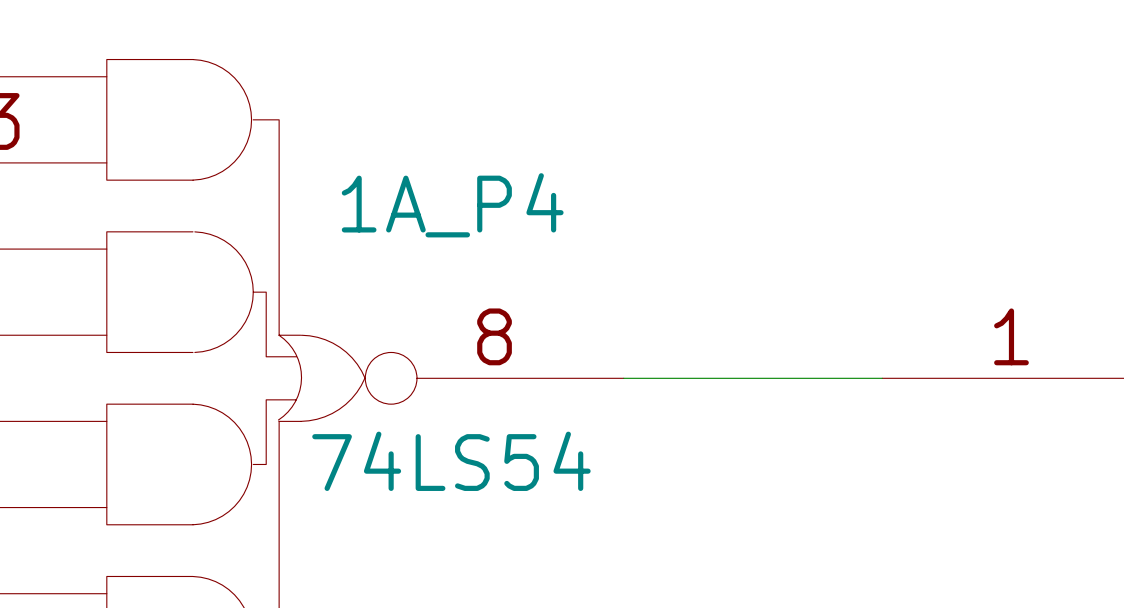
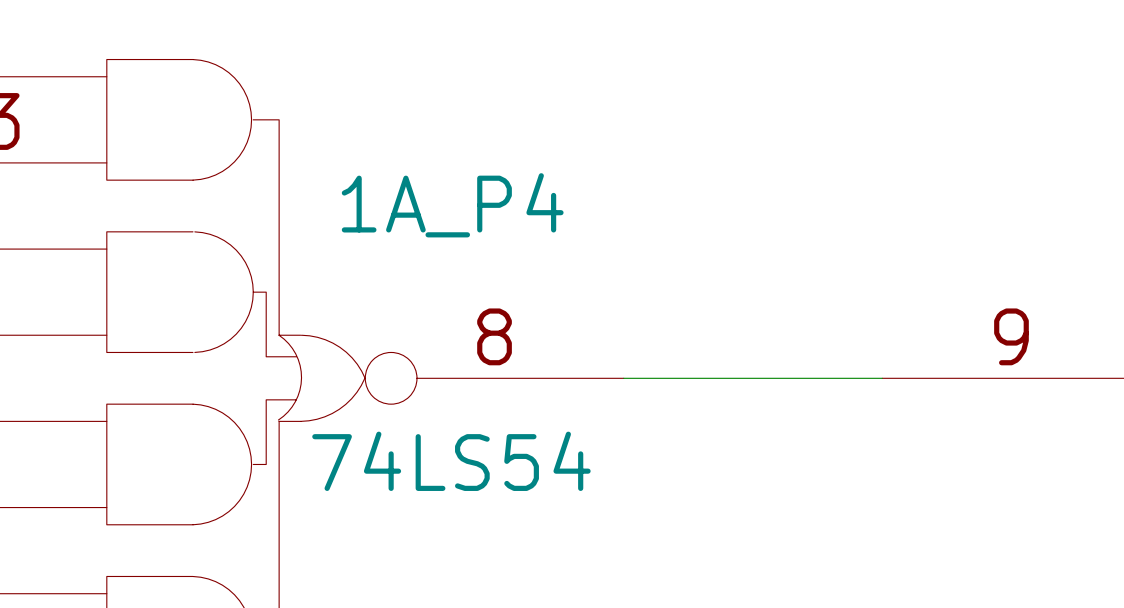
part pin number: 1 (1011, 336) -> 9 (1011, 336)

